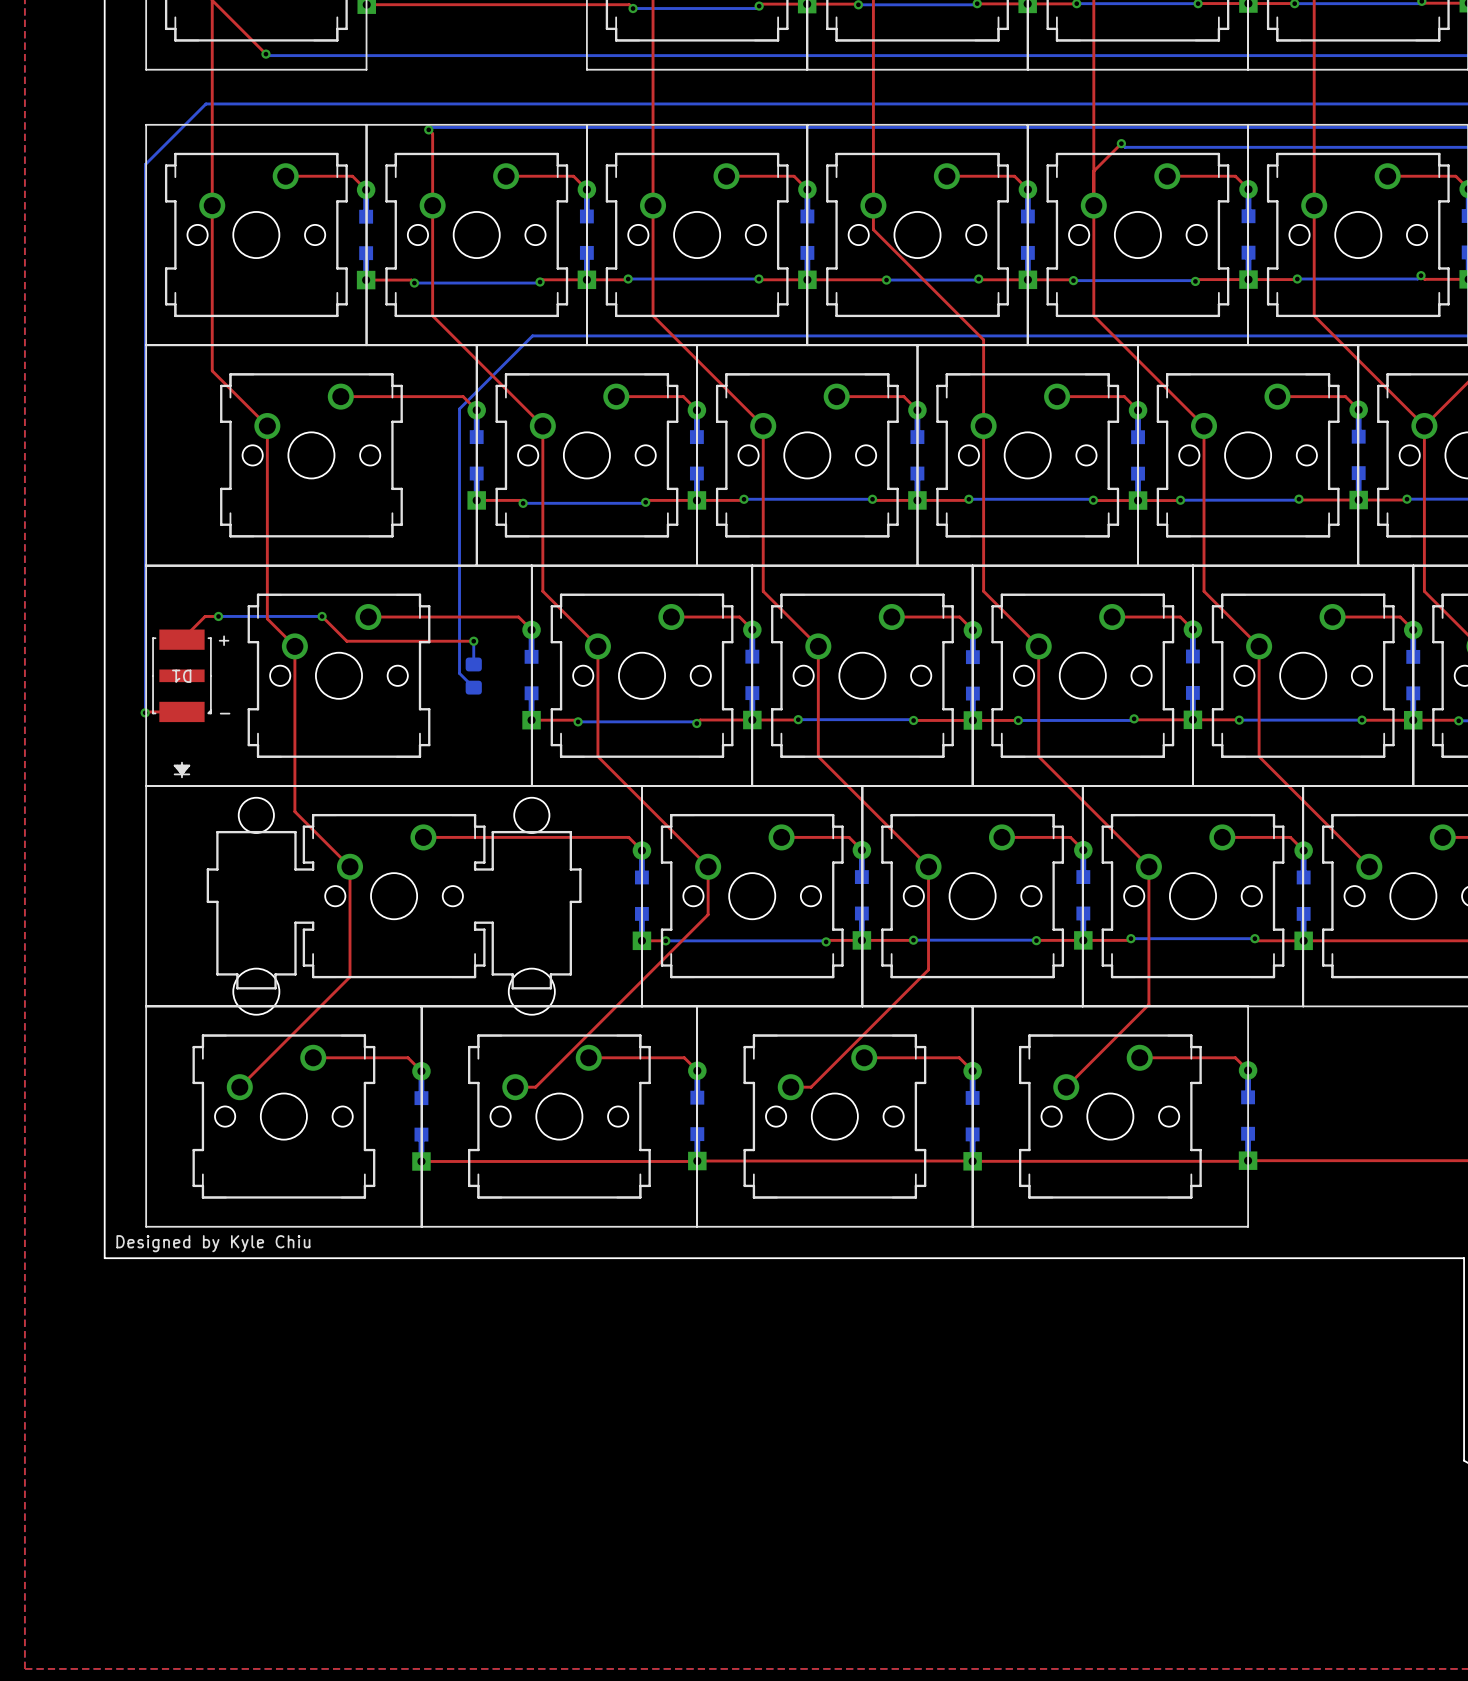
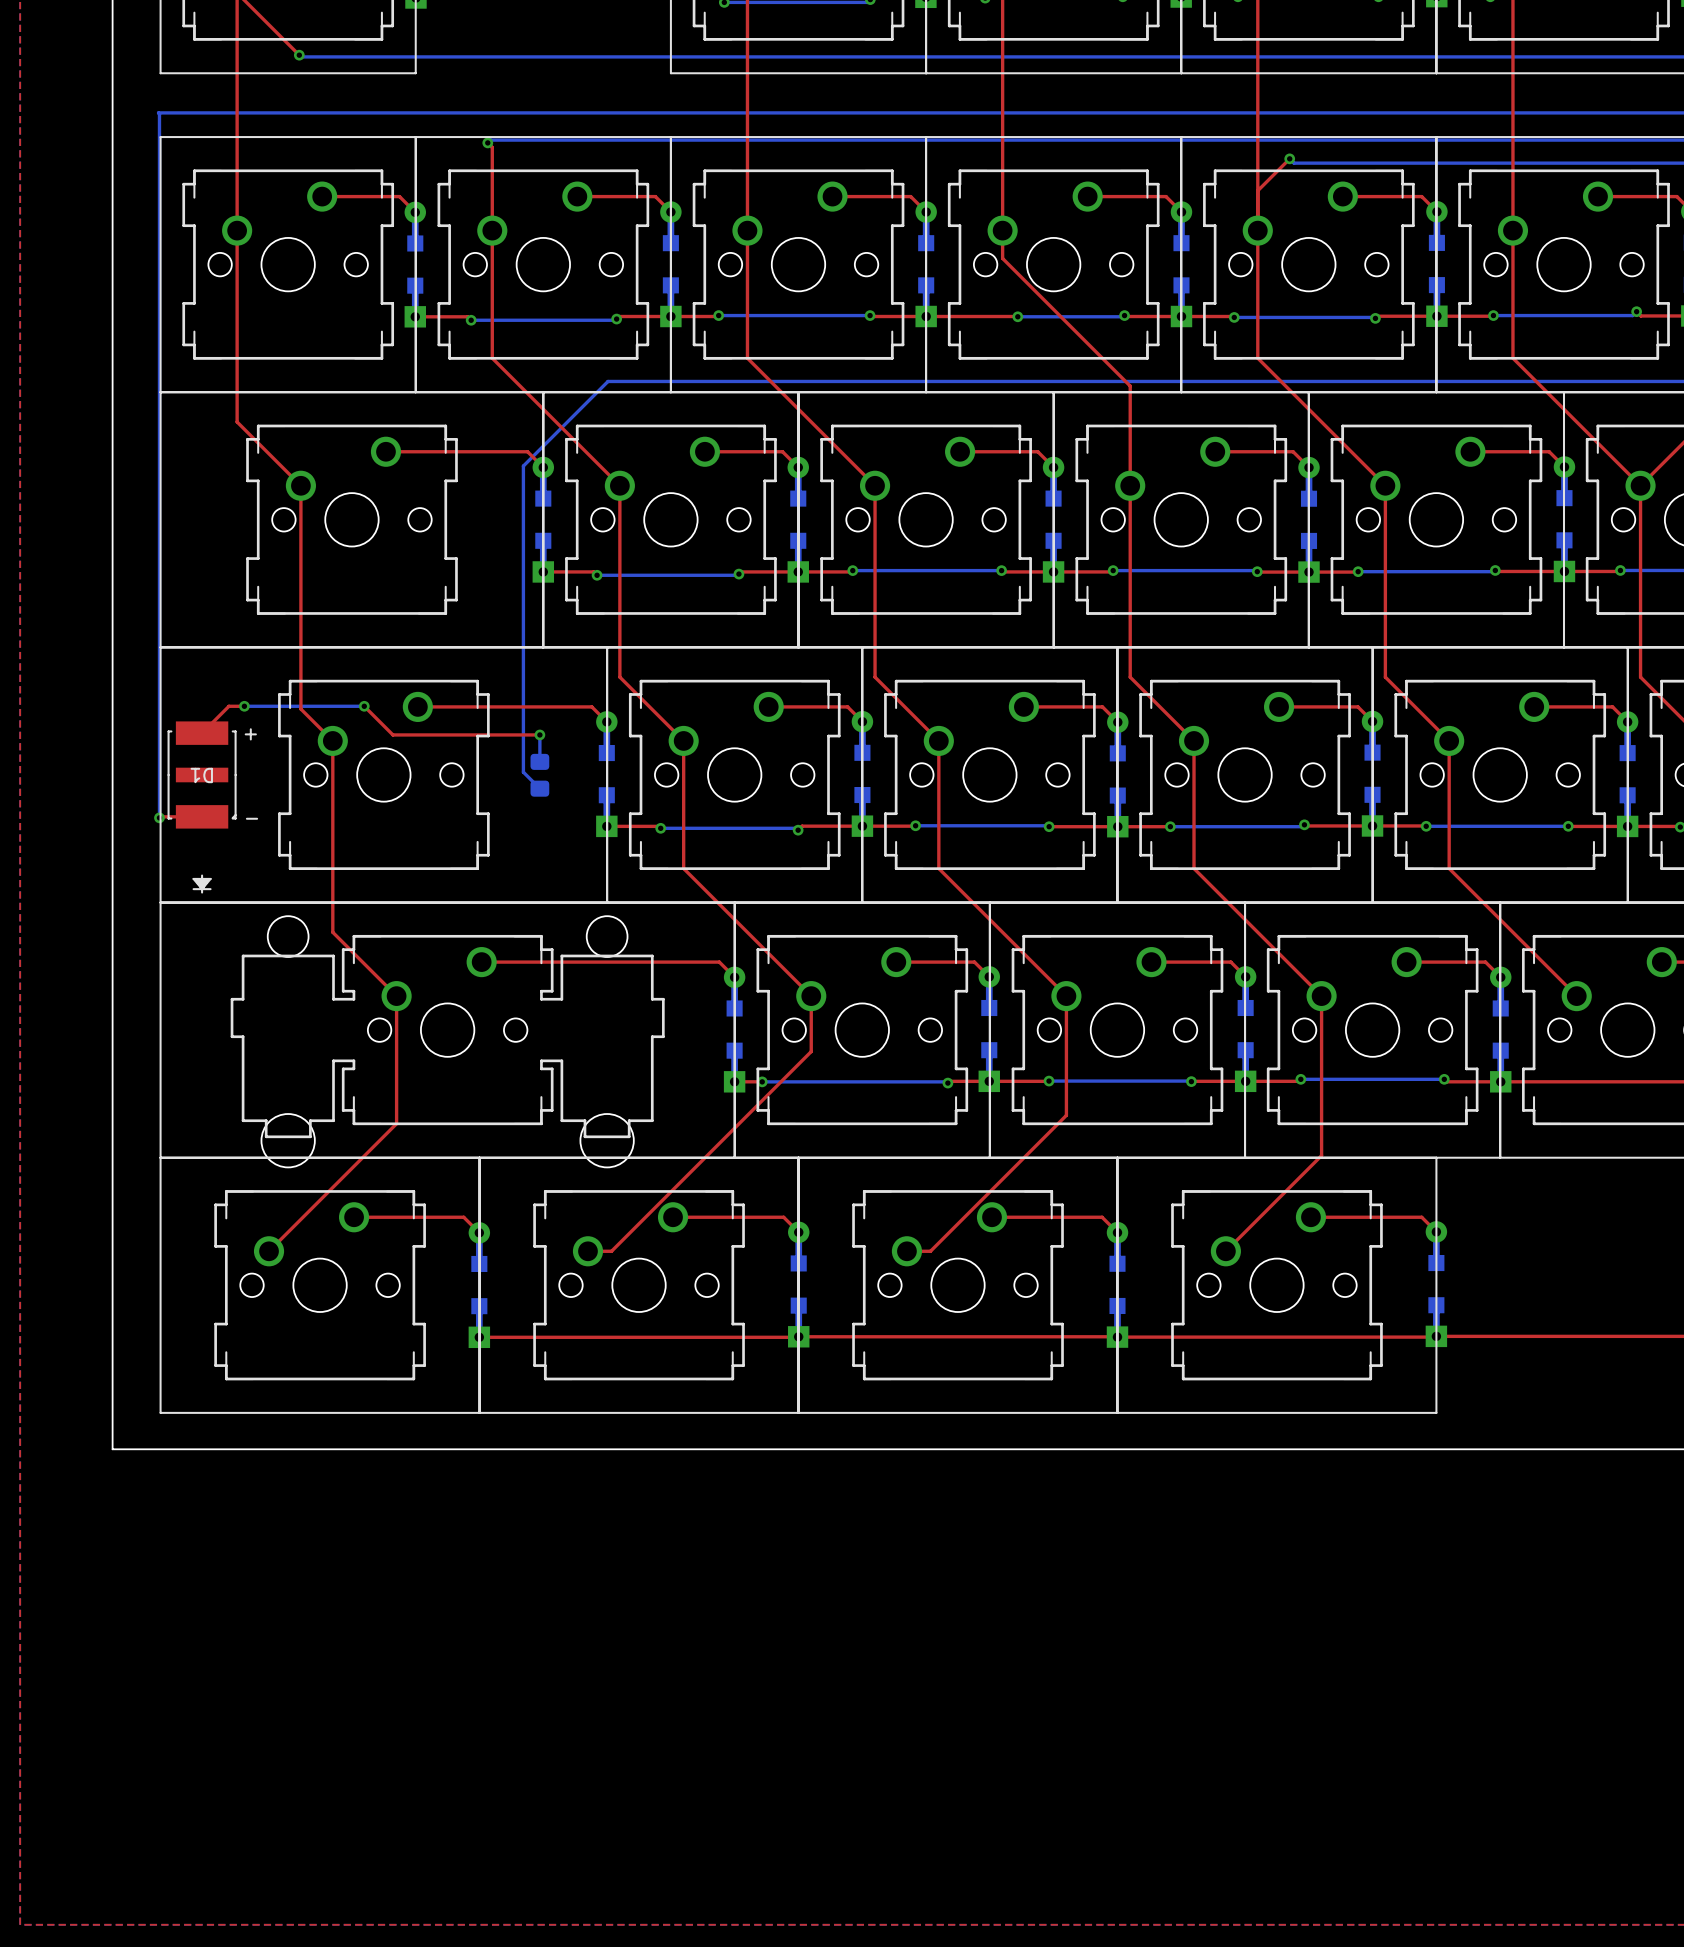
bottom track: (205, 103) (145, 164) (145, 712) -> (229, 112) (158, 112) (159, 817)
text: Designed by Kyle Chiu (213, 1243) -> none

